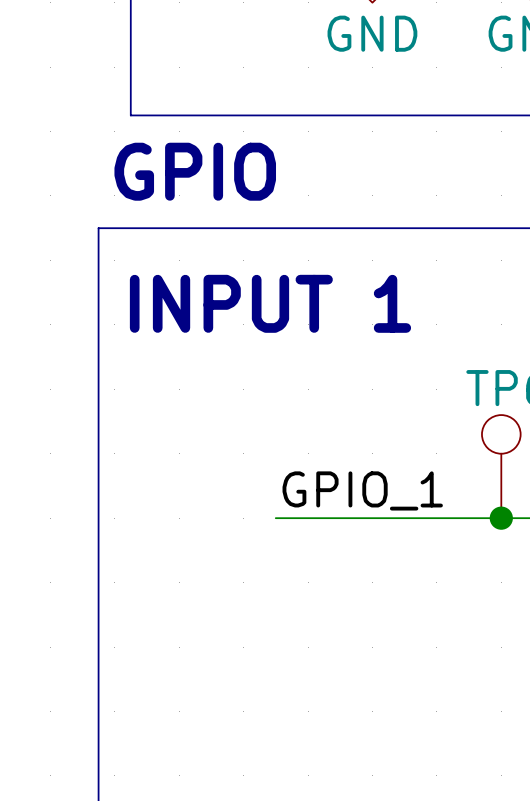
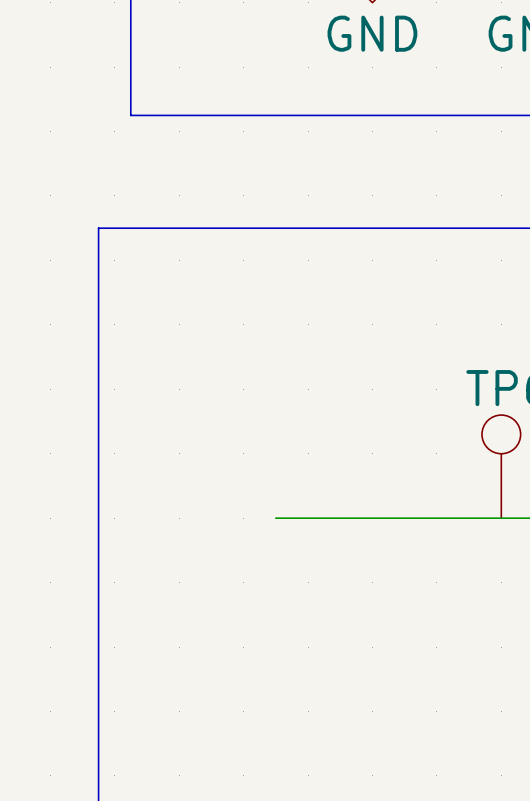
text: GPIO (195, 171) -> none
text: INPUT 1 (270, 303) -> none
label: GPIO_1 (362, 490) -> none
junction: (501, 518) -> none

